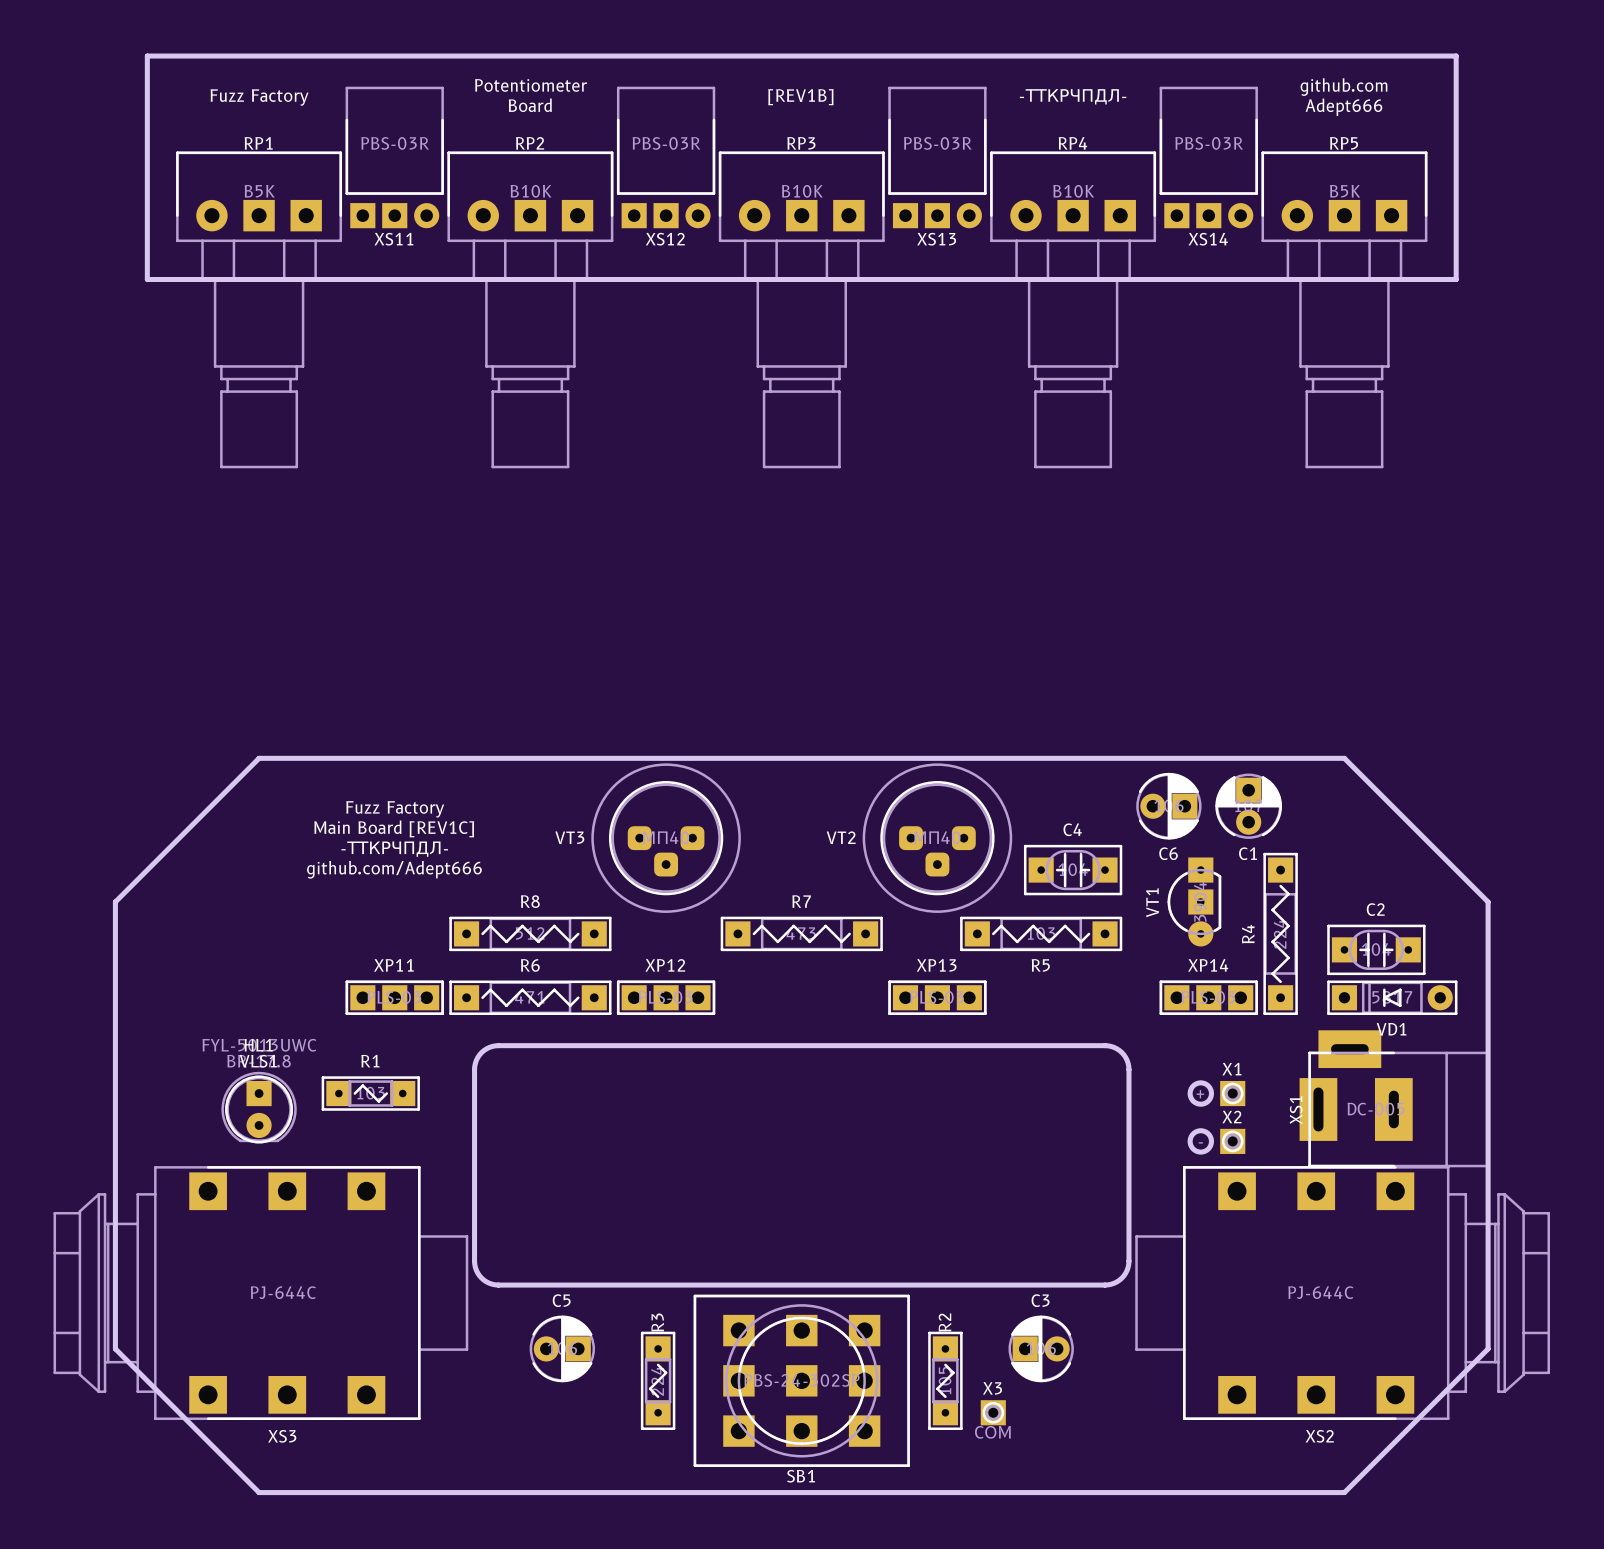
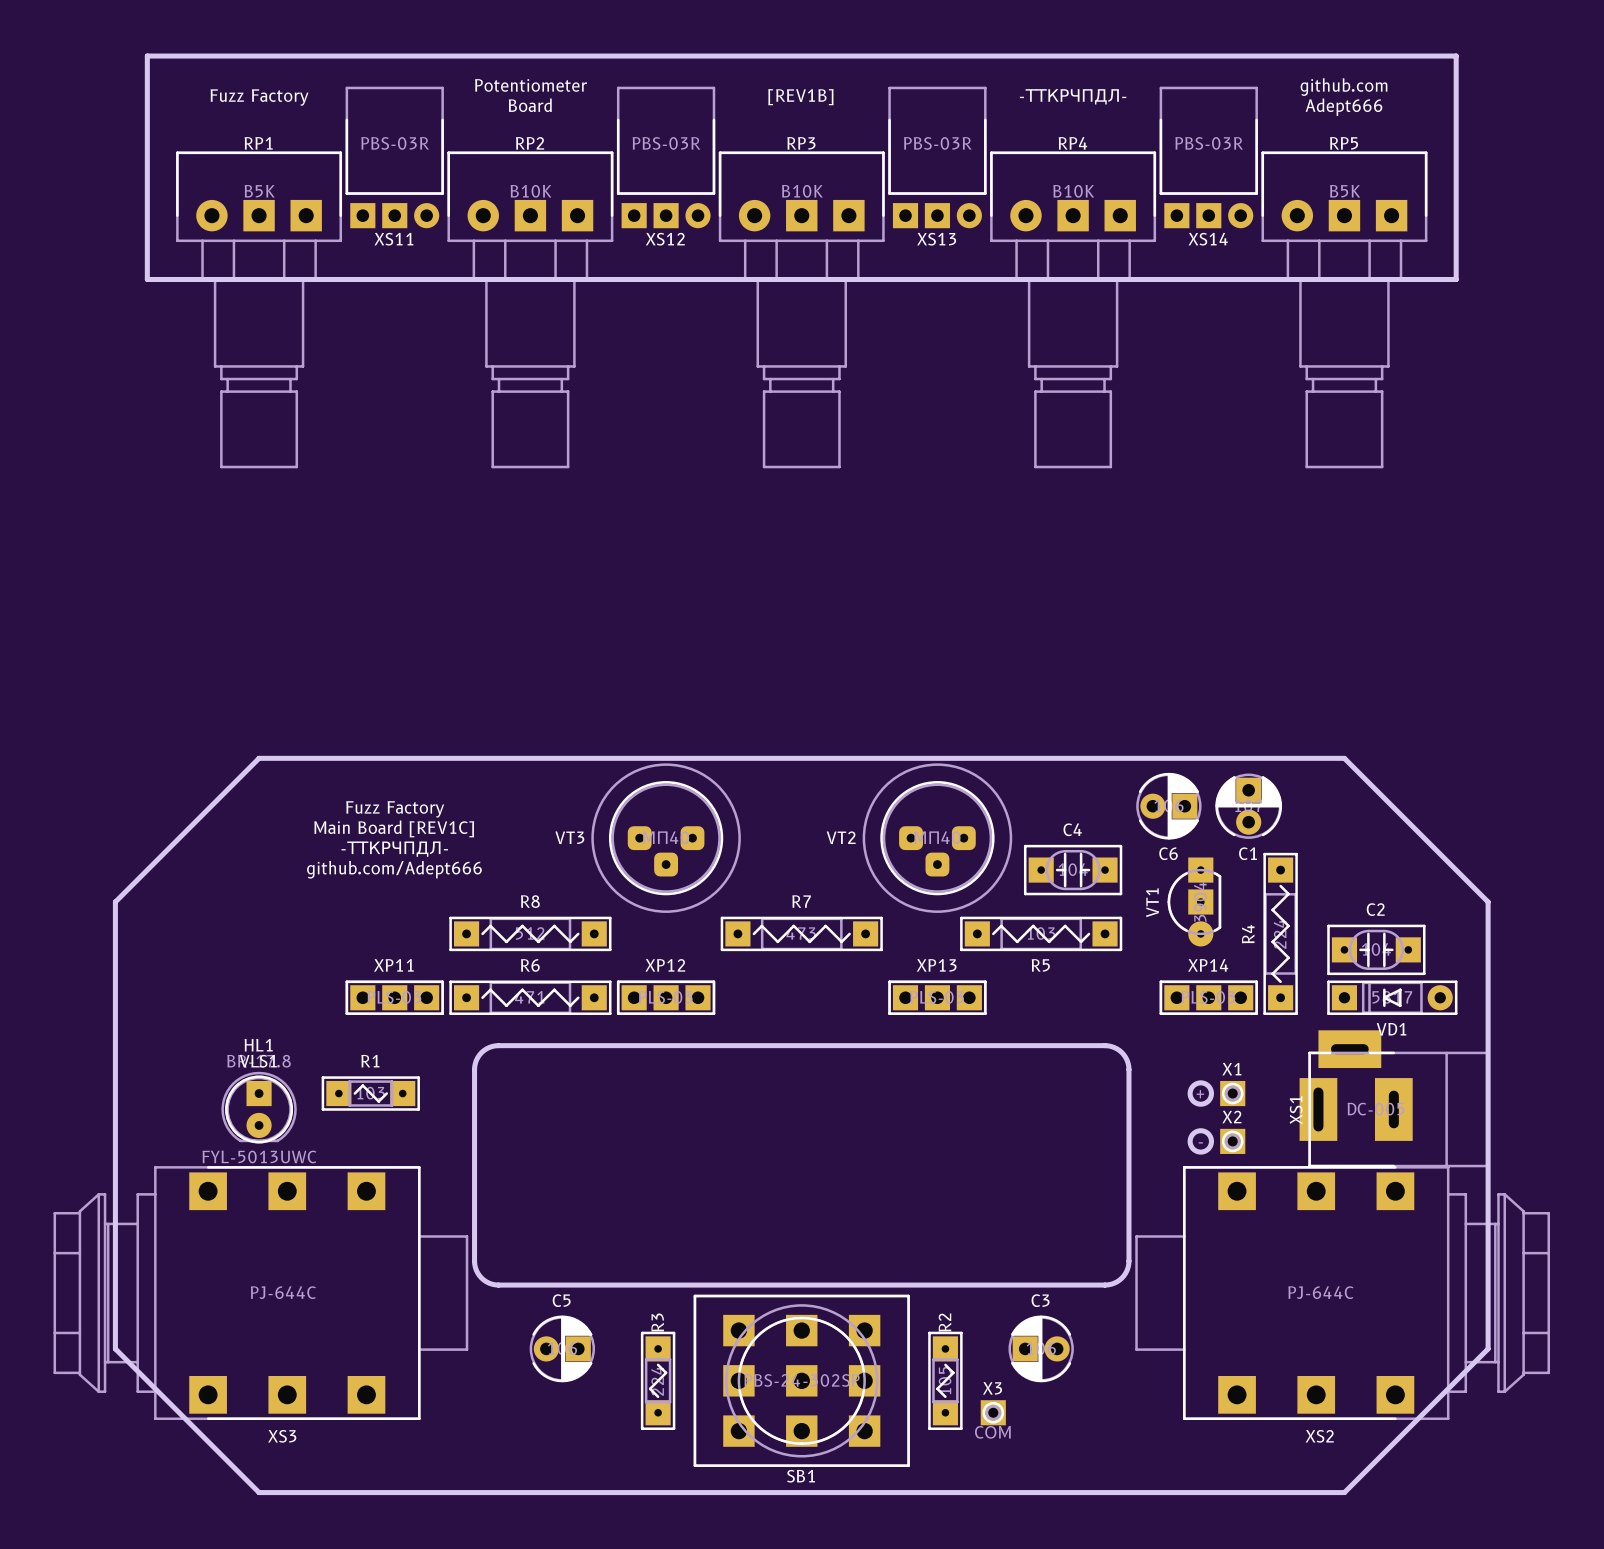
HL1 value position: FYL-5013UWC (259, 1045) -> FYL-5013UWC (259, 1156)

